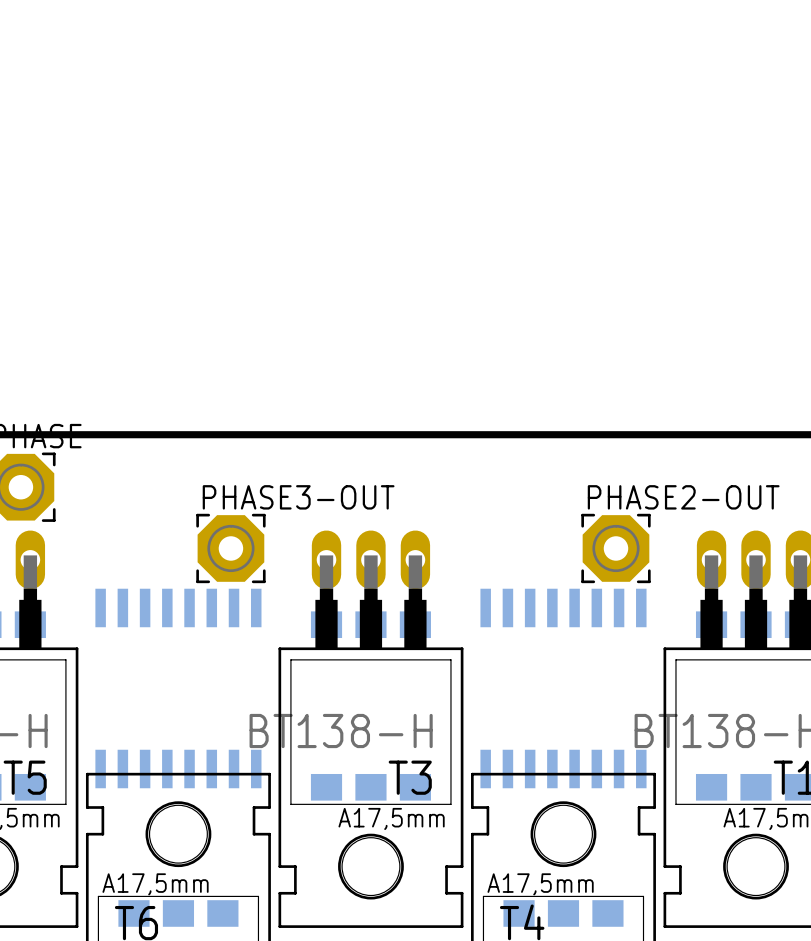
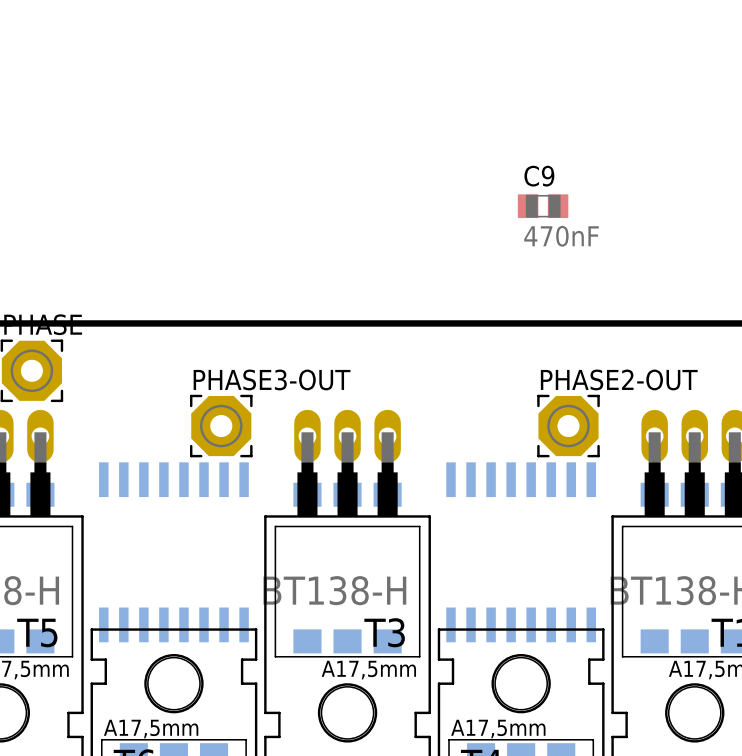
C9: none -> 470nF (543, 206)

